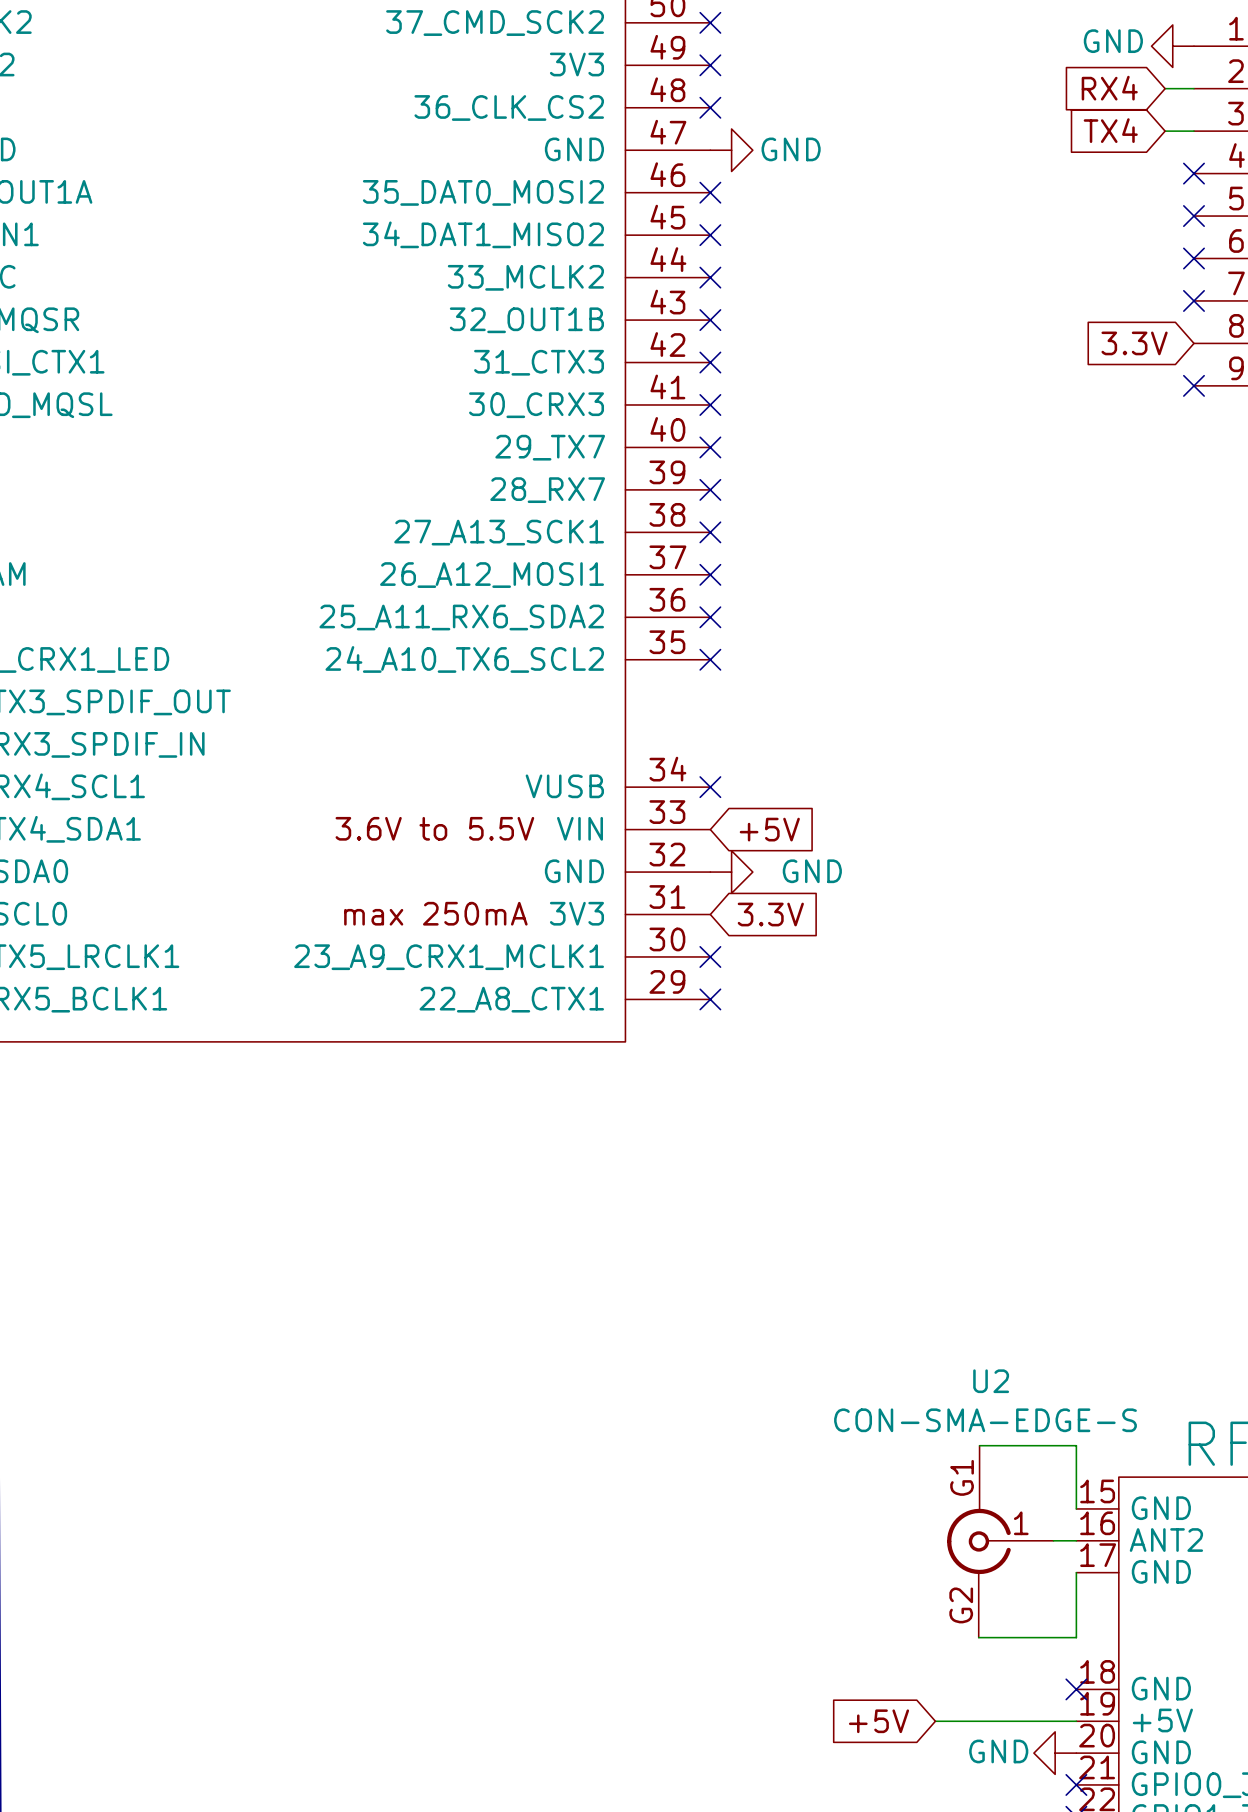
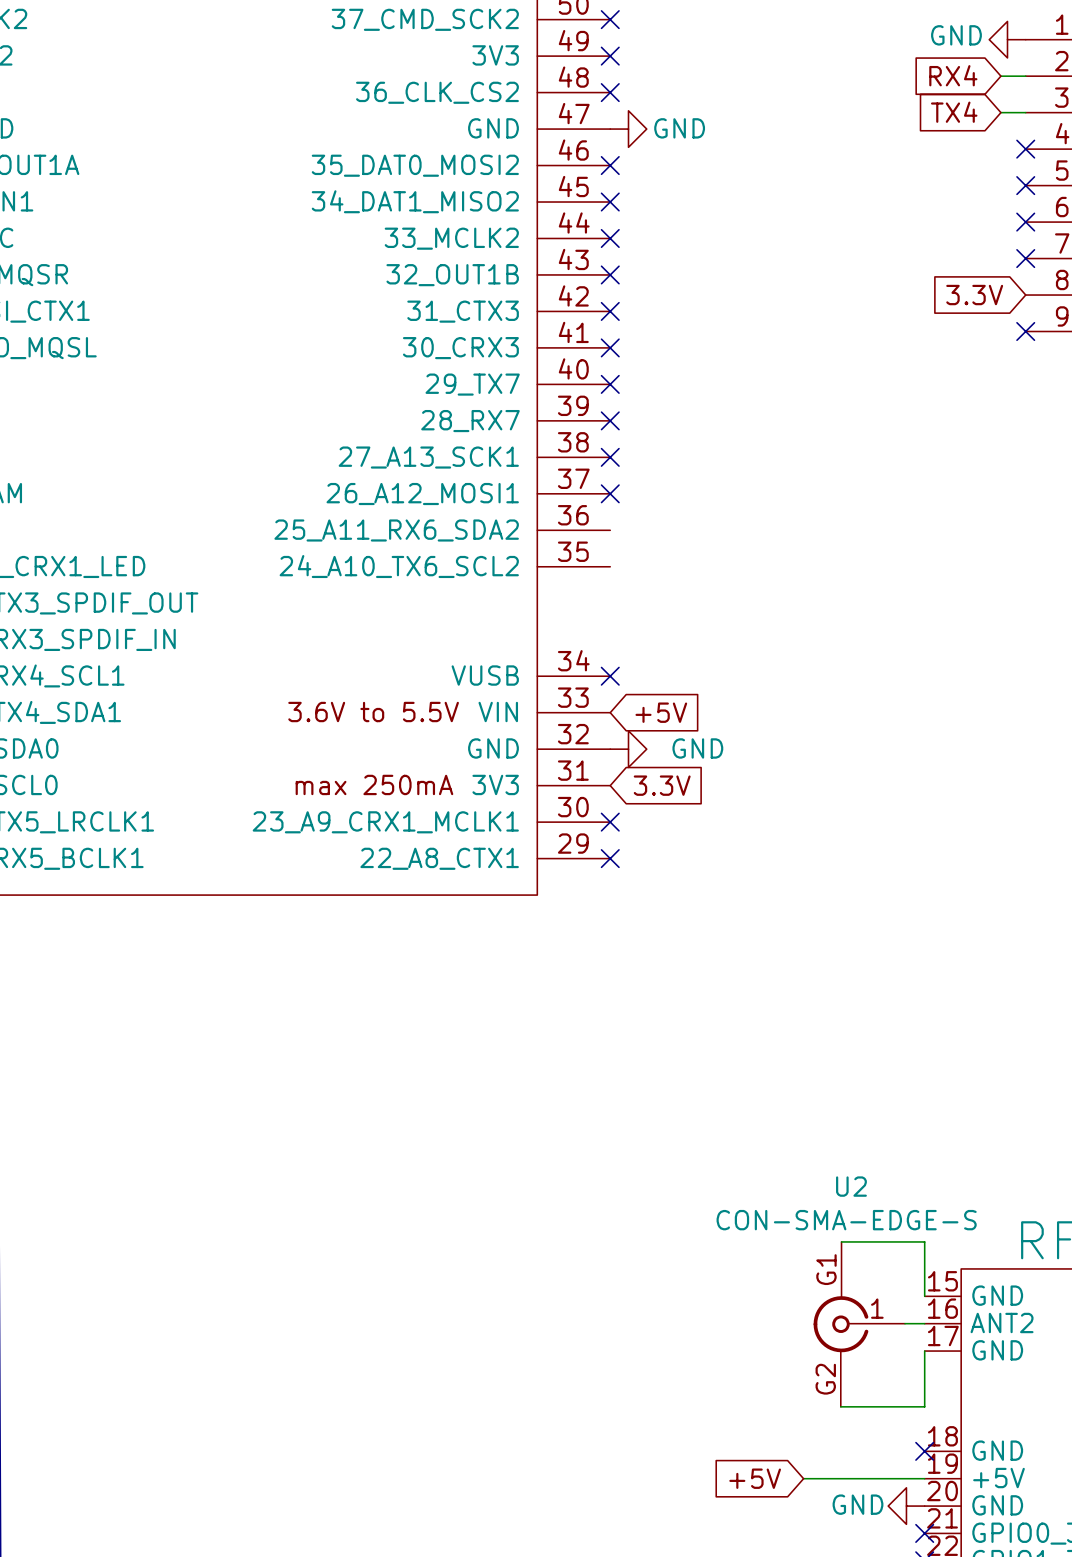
no-connect mark: (710, 617) -> none
no-connect mark: (710, 659) -> none

